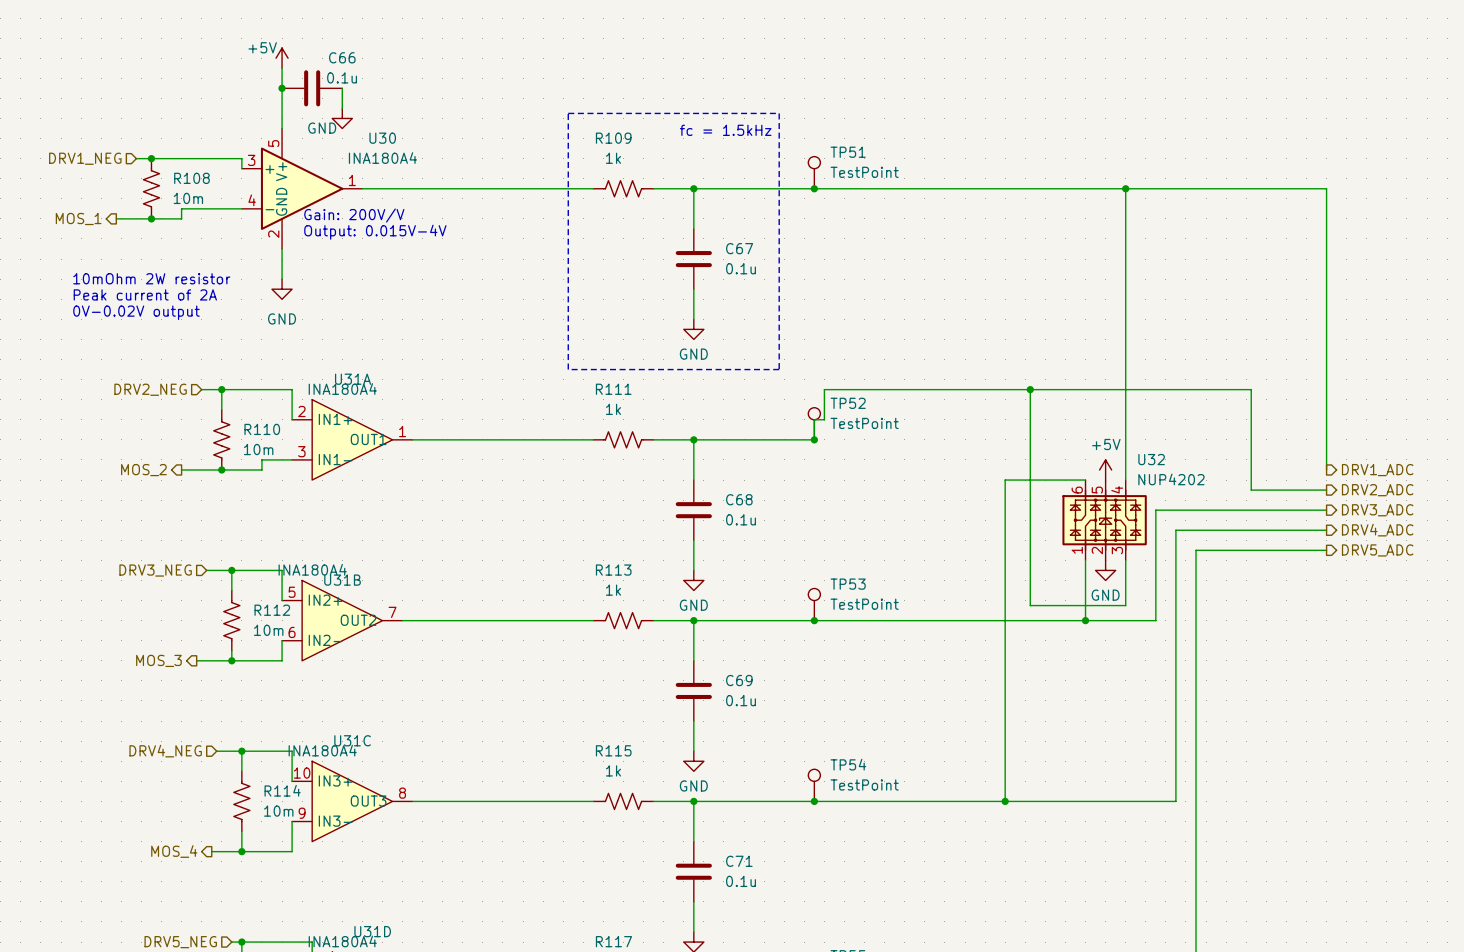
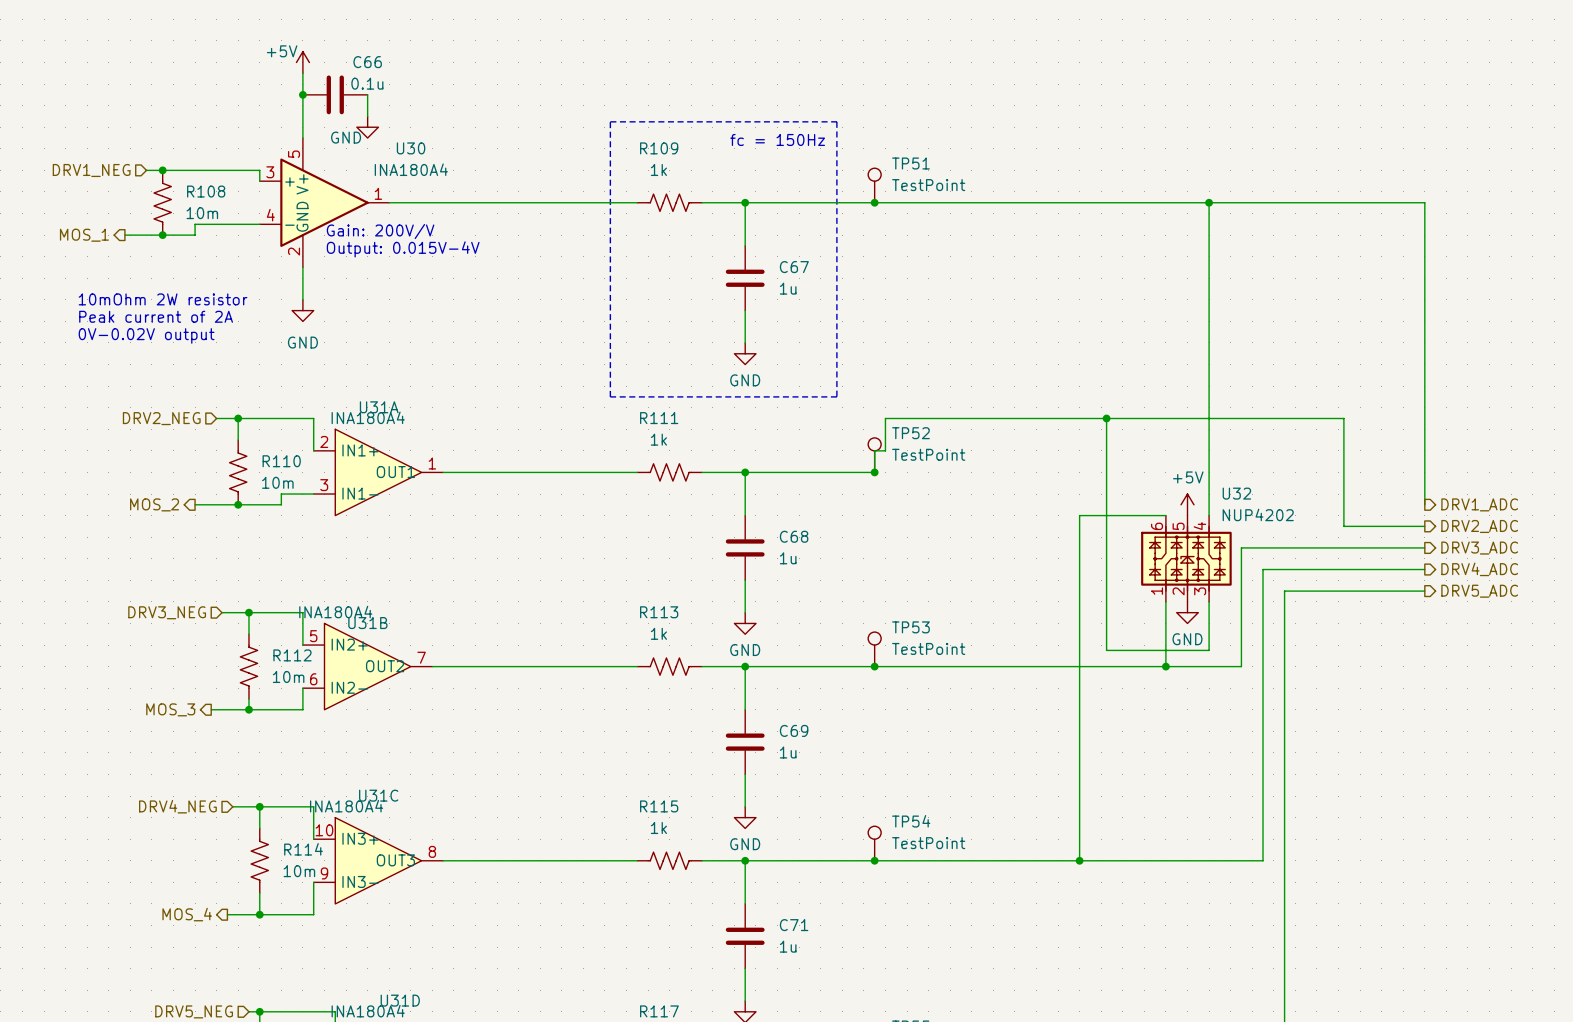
text: fc = 1.5kHz (725, 130) -> fc = 150Hz (777, 139)
C67 value: 0.1u (741, 268) -> 1u (788, 288)
C68 value: 0.1u (741, 519) -> 1u (788, 558)
C69 value: 0.1u (741, 700) -> 1u (788, 752)
C71 value: 0.1u (741, 881) -> 1u (788, 946)

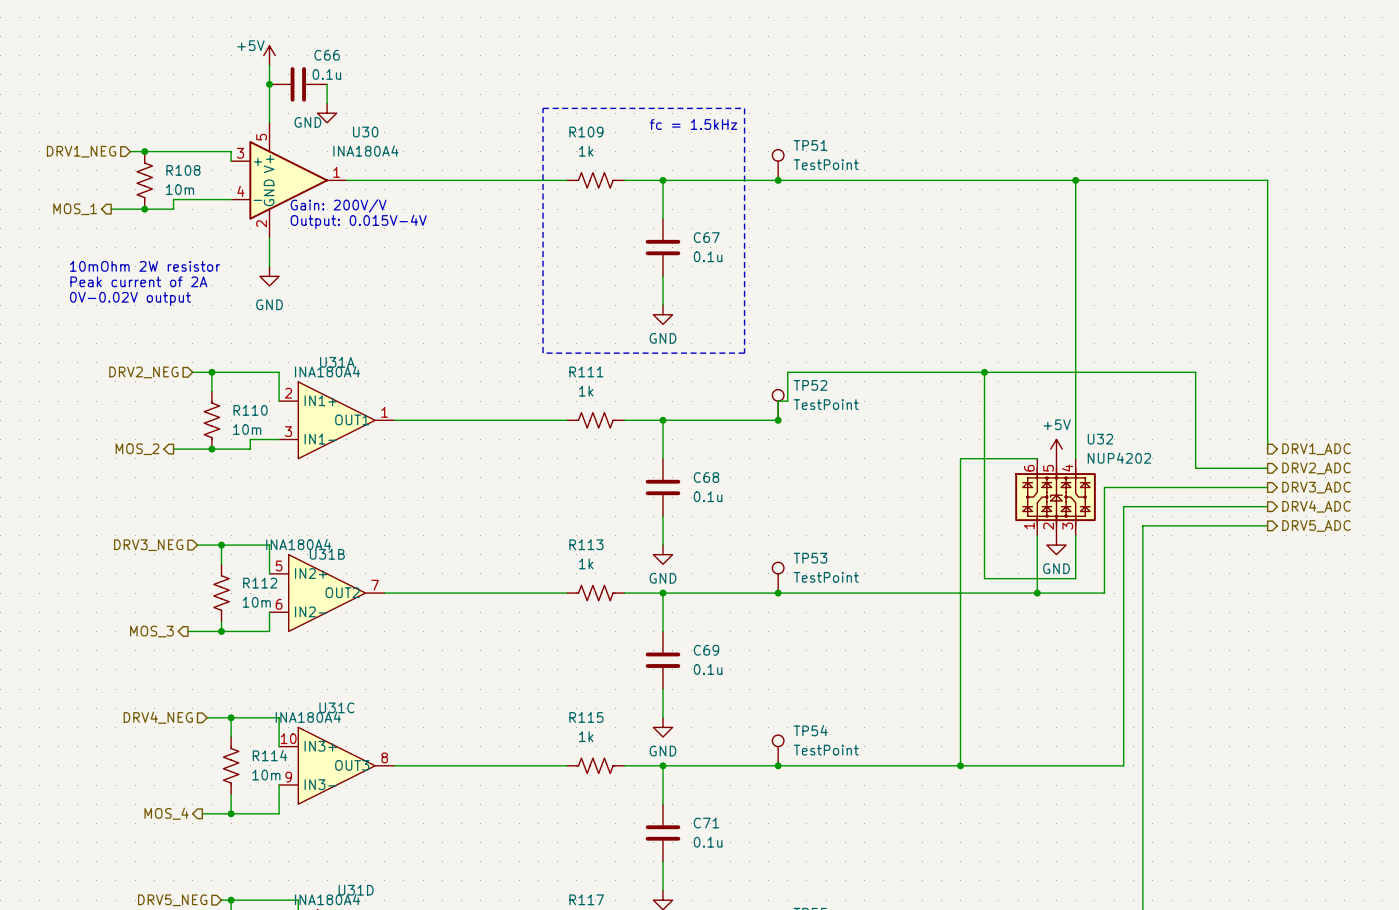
text: fc = 150Hz (777, 139) -> fc = 1.5kHz (693, 124)
C67 value: 1u (788, 288) -> 0.1u (708, 256)
C68 value: 1u (788, 558) -> 0.1u (708, 496)
C69 value: 1u (788, 752) -> 0.1u (708, 669)
C71 value: 1u (788, 946) -> 0.1u (708, 842)

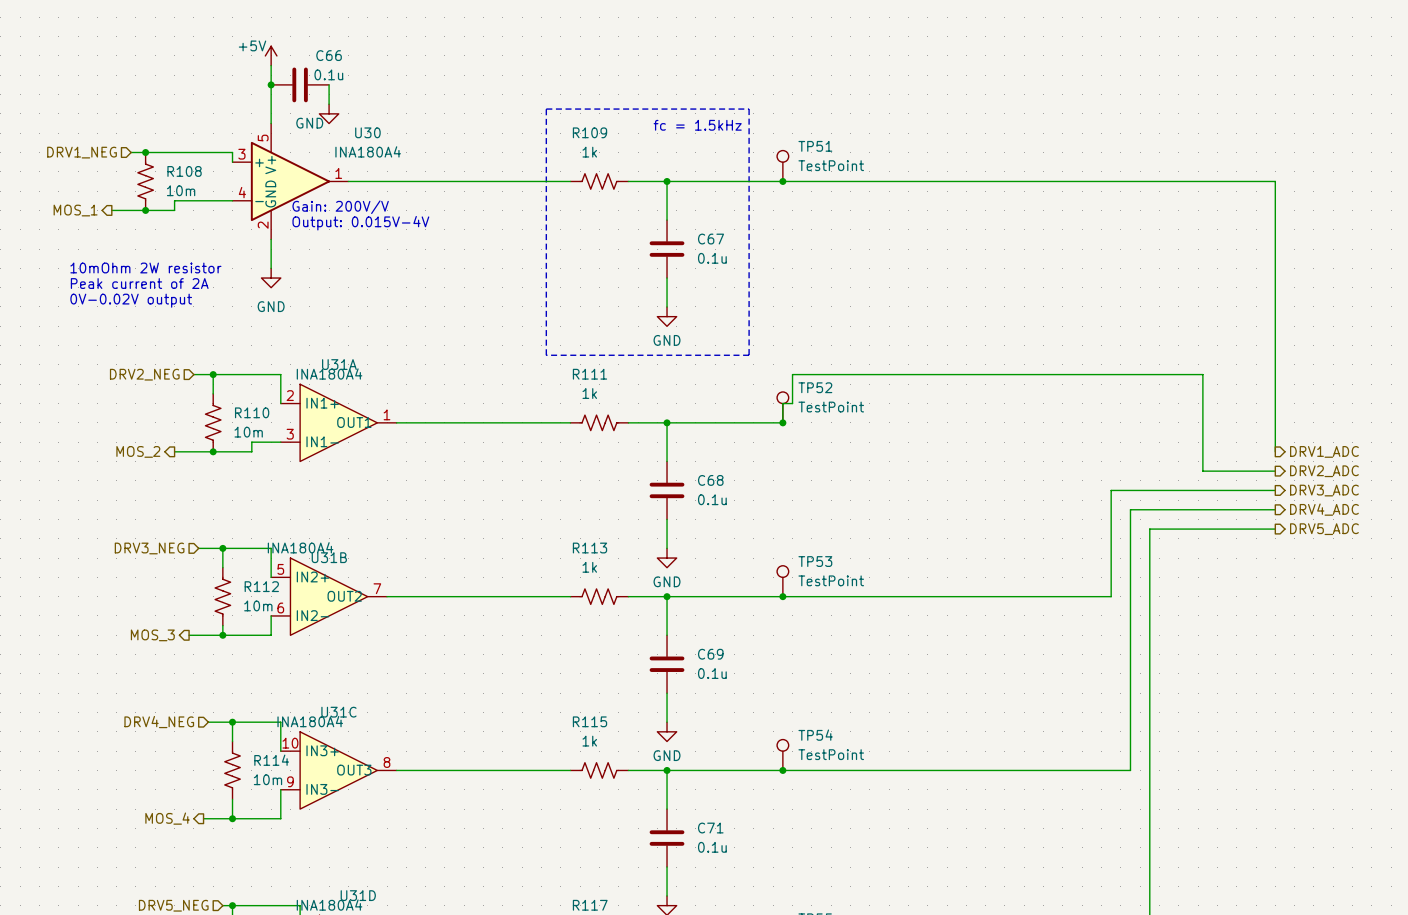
wire: (1075, 180) (1075, 458) -> none
junction: (1075, 180) -> none
wire: (984, 372) (984, 578) (1075, 578) (1075, 535) -> none
junction: (984, 372) -> none
power symbol: +5V (1056, 449) -> none
wire: (1037, 458) (960, 458) (960, 765) -> none
U32: NUP4202 (1055, 497) -> none
wire: (1037, 535) (1037, 593) -> none
power symbol: GND (1056, 545) -> none
junction: (1037, 593) -> none
junction: (960, 765) -> none

